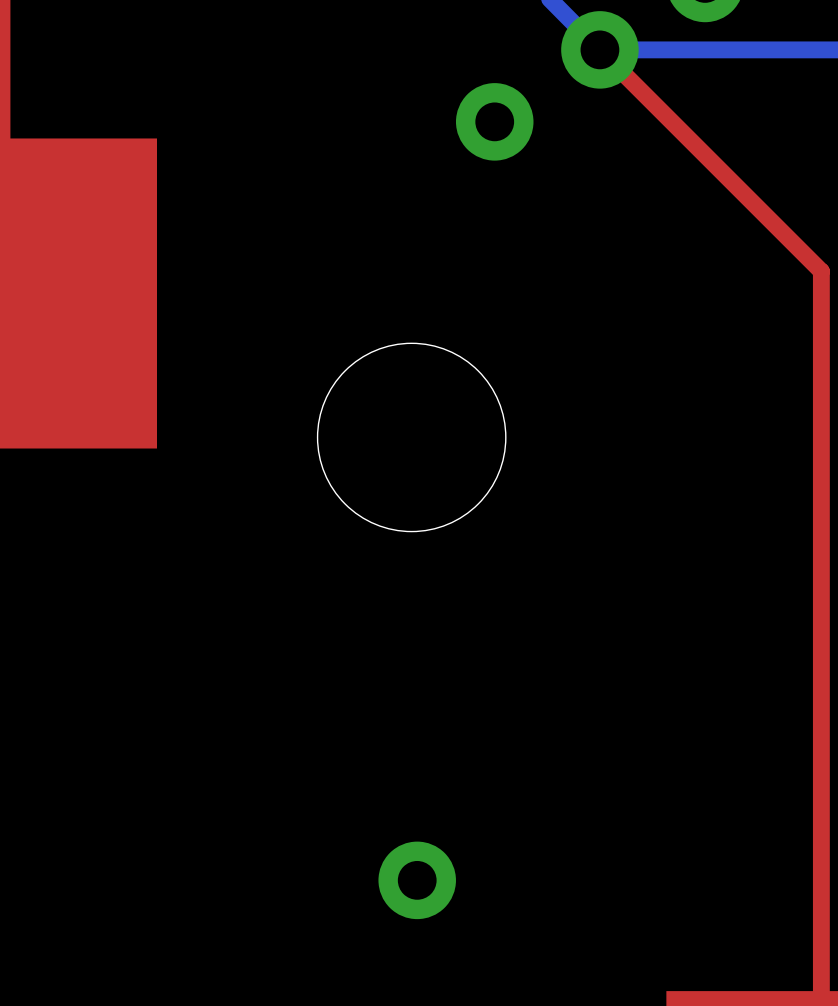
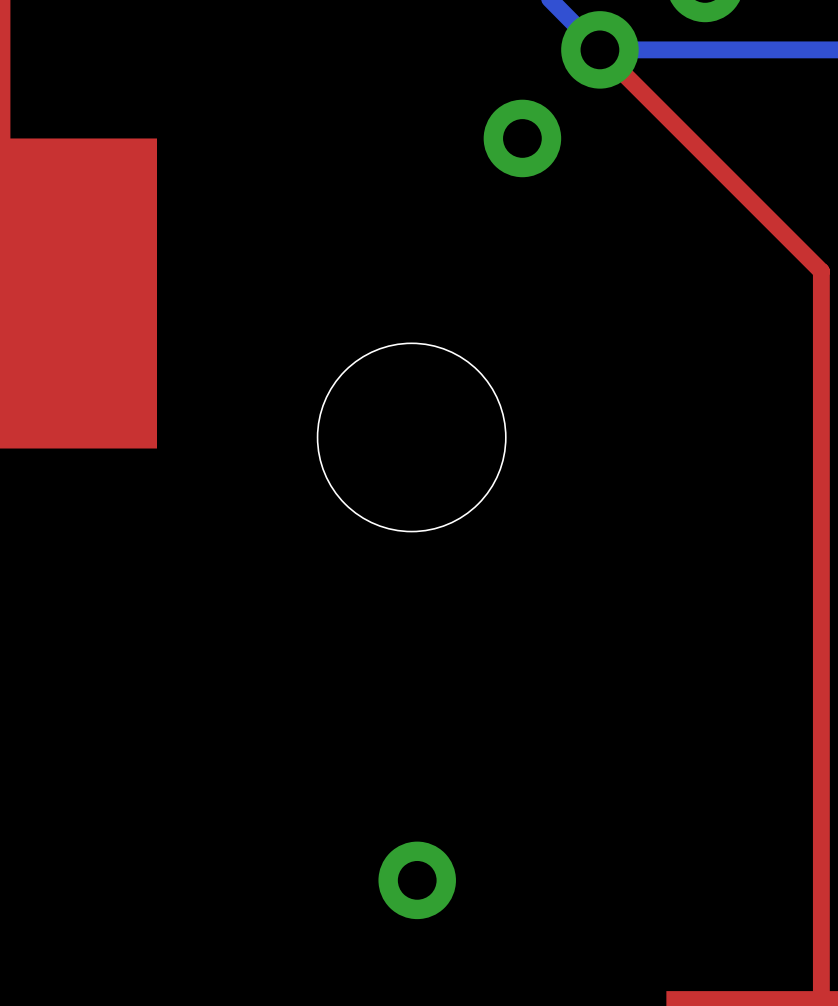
via position: (494, 121) -> (522, 138)

